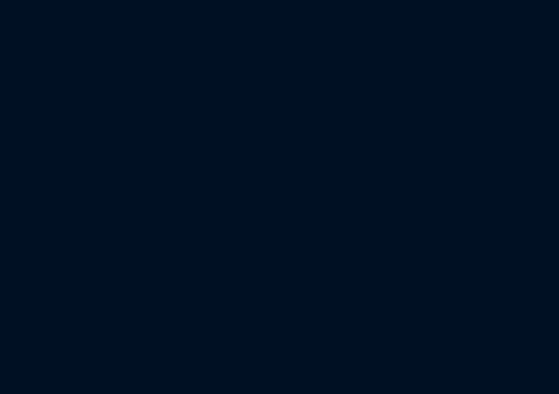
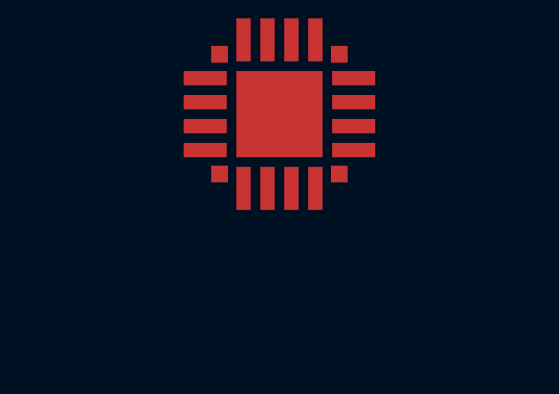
part: none -> (279, 114)

